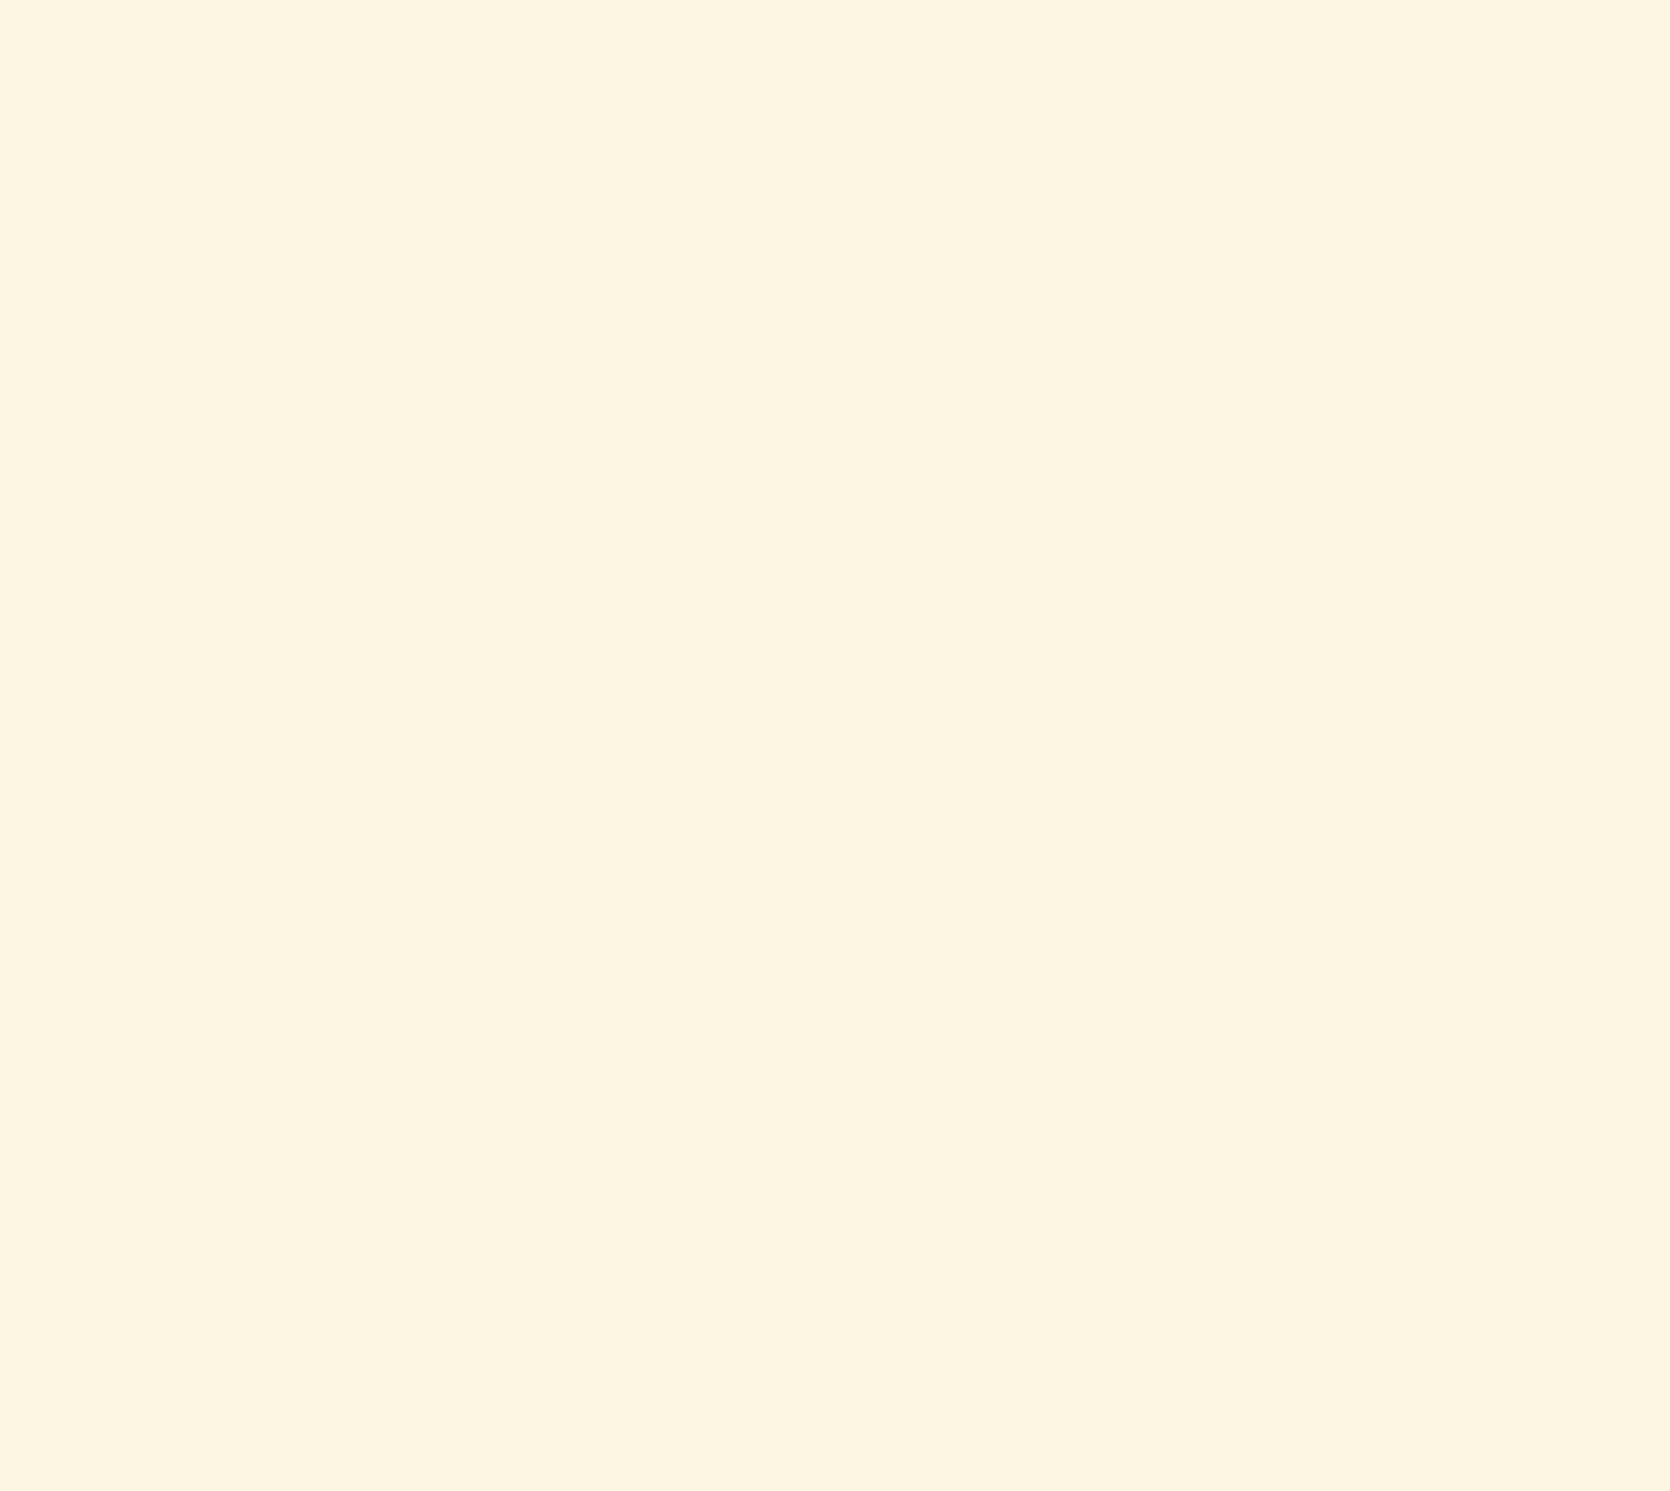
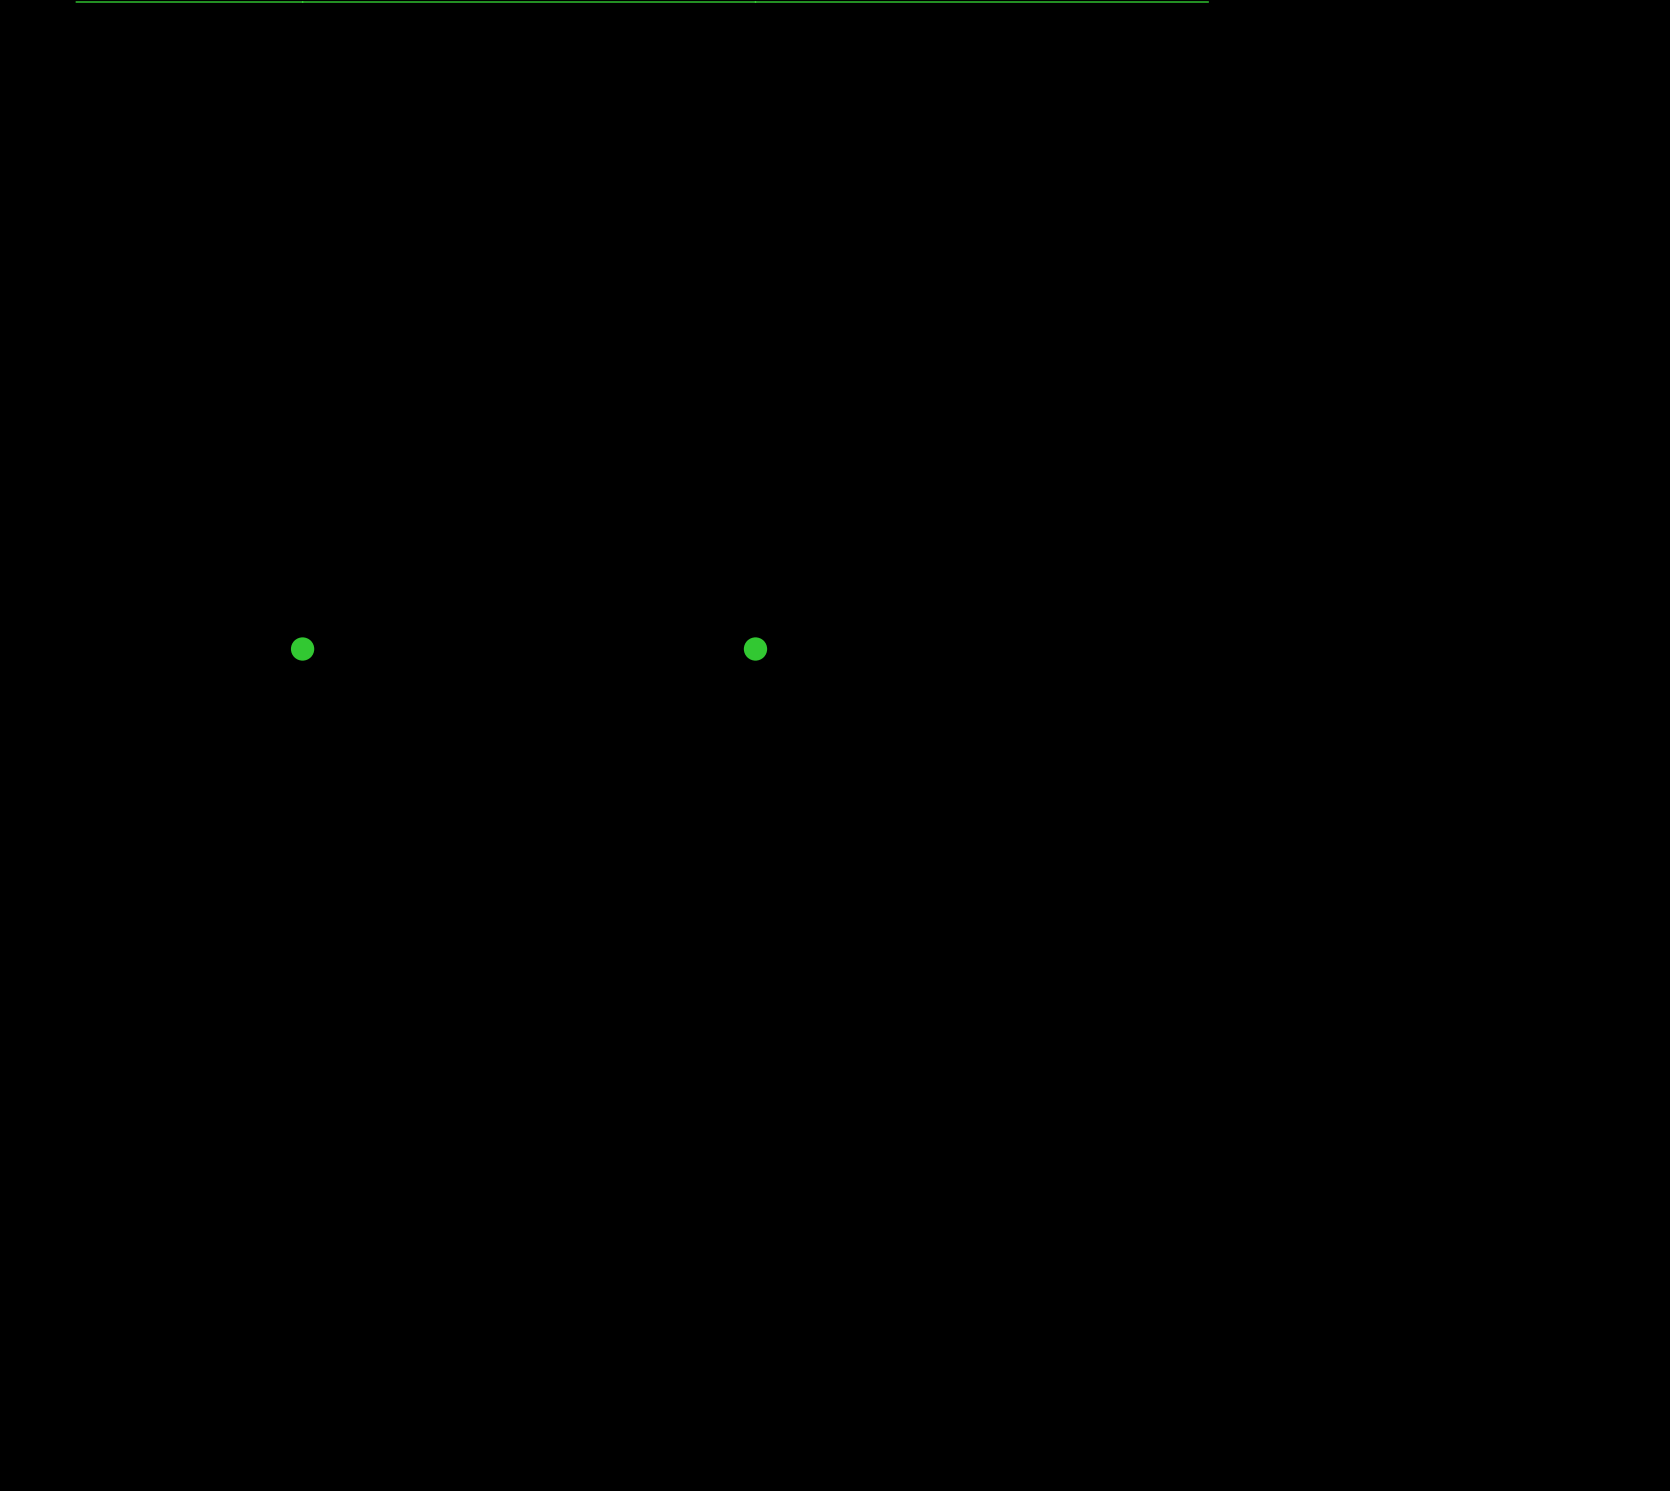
wire: none -> (76, 2) (1208, 2)
junction: none -> (302, 649)
junction: none -> (755, 649)

